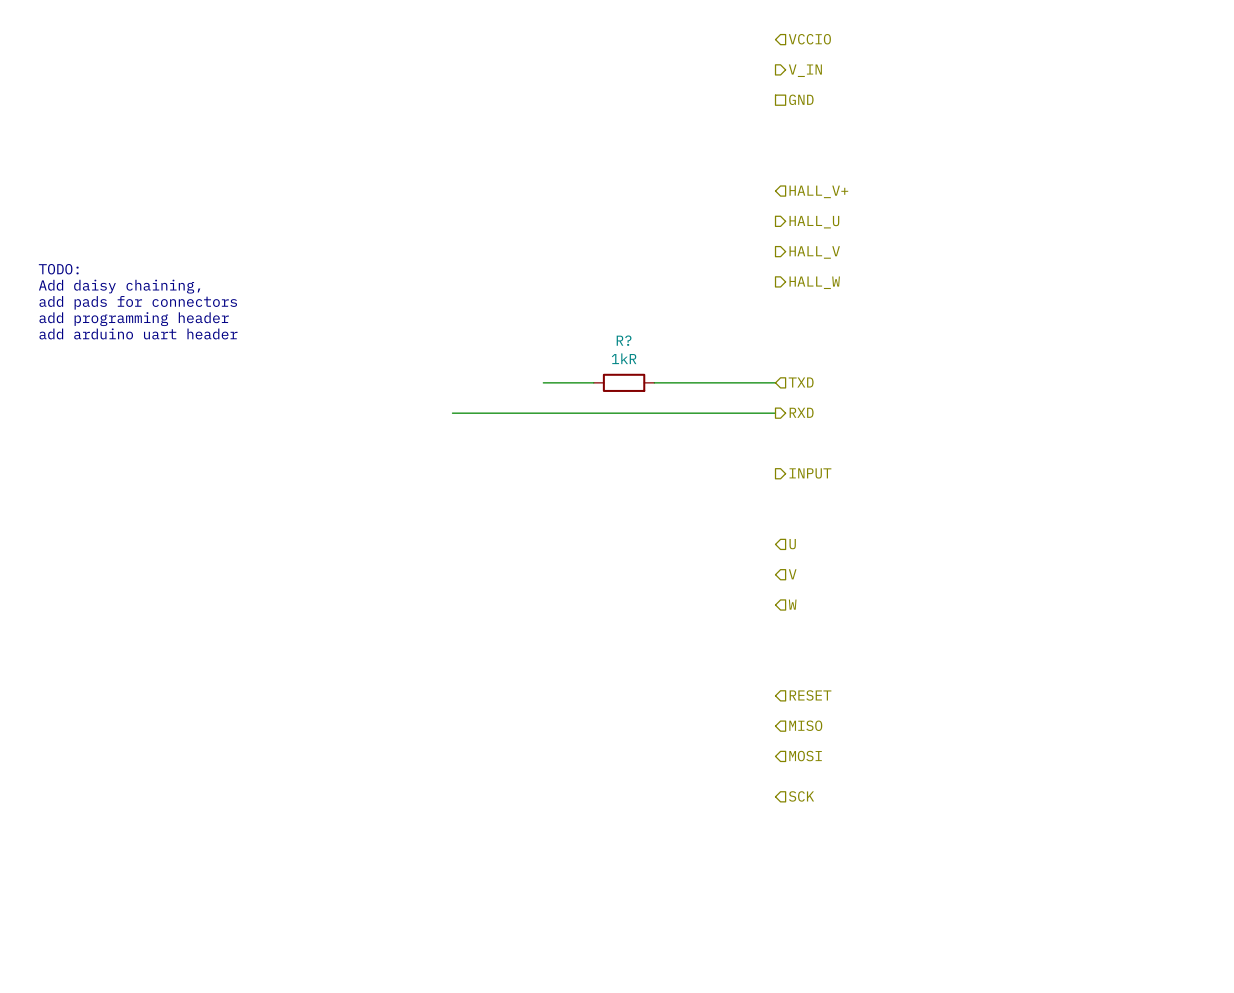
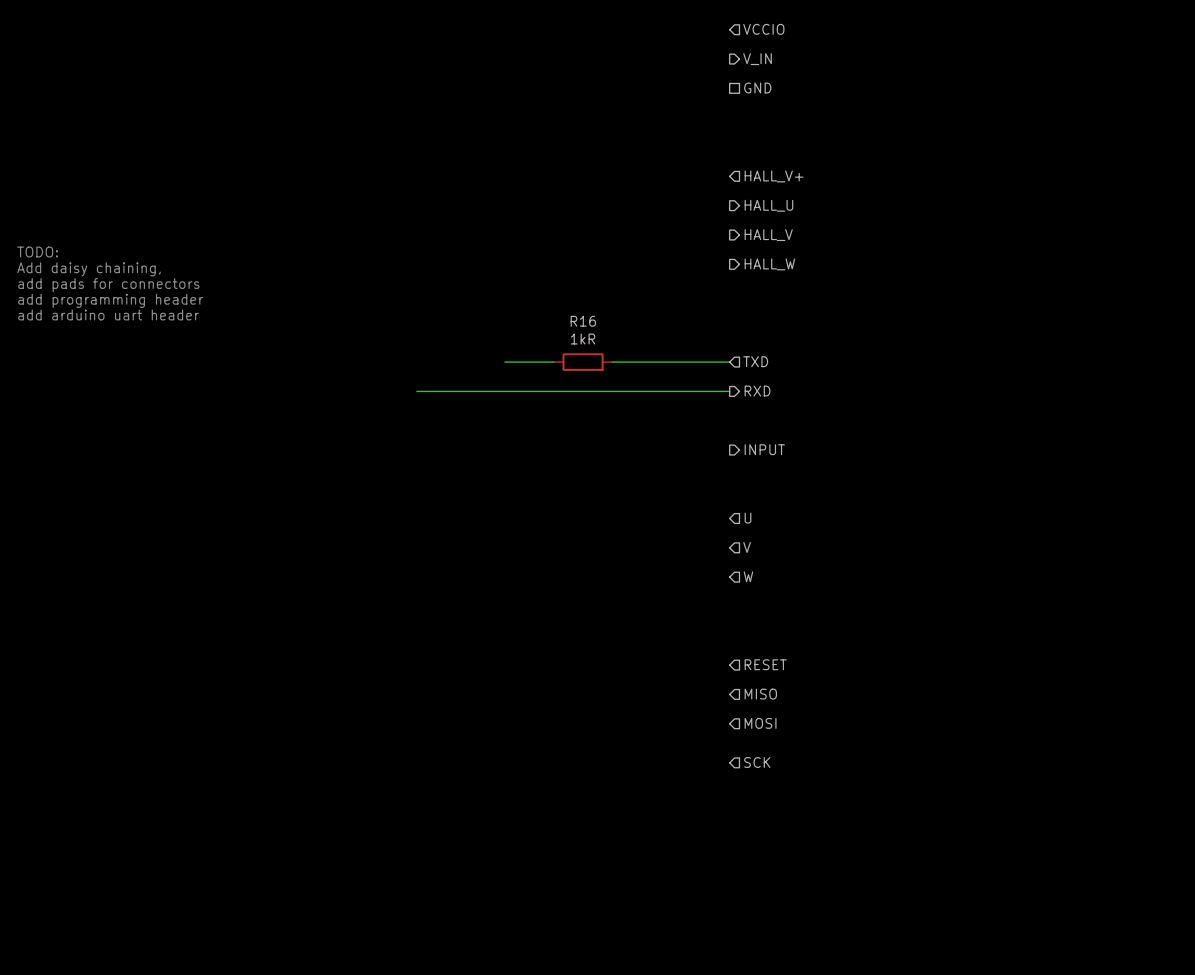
R? name: R? (624, 340) -> R16 (583, 321)

